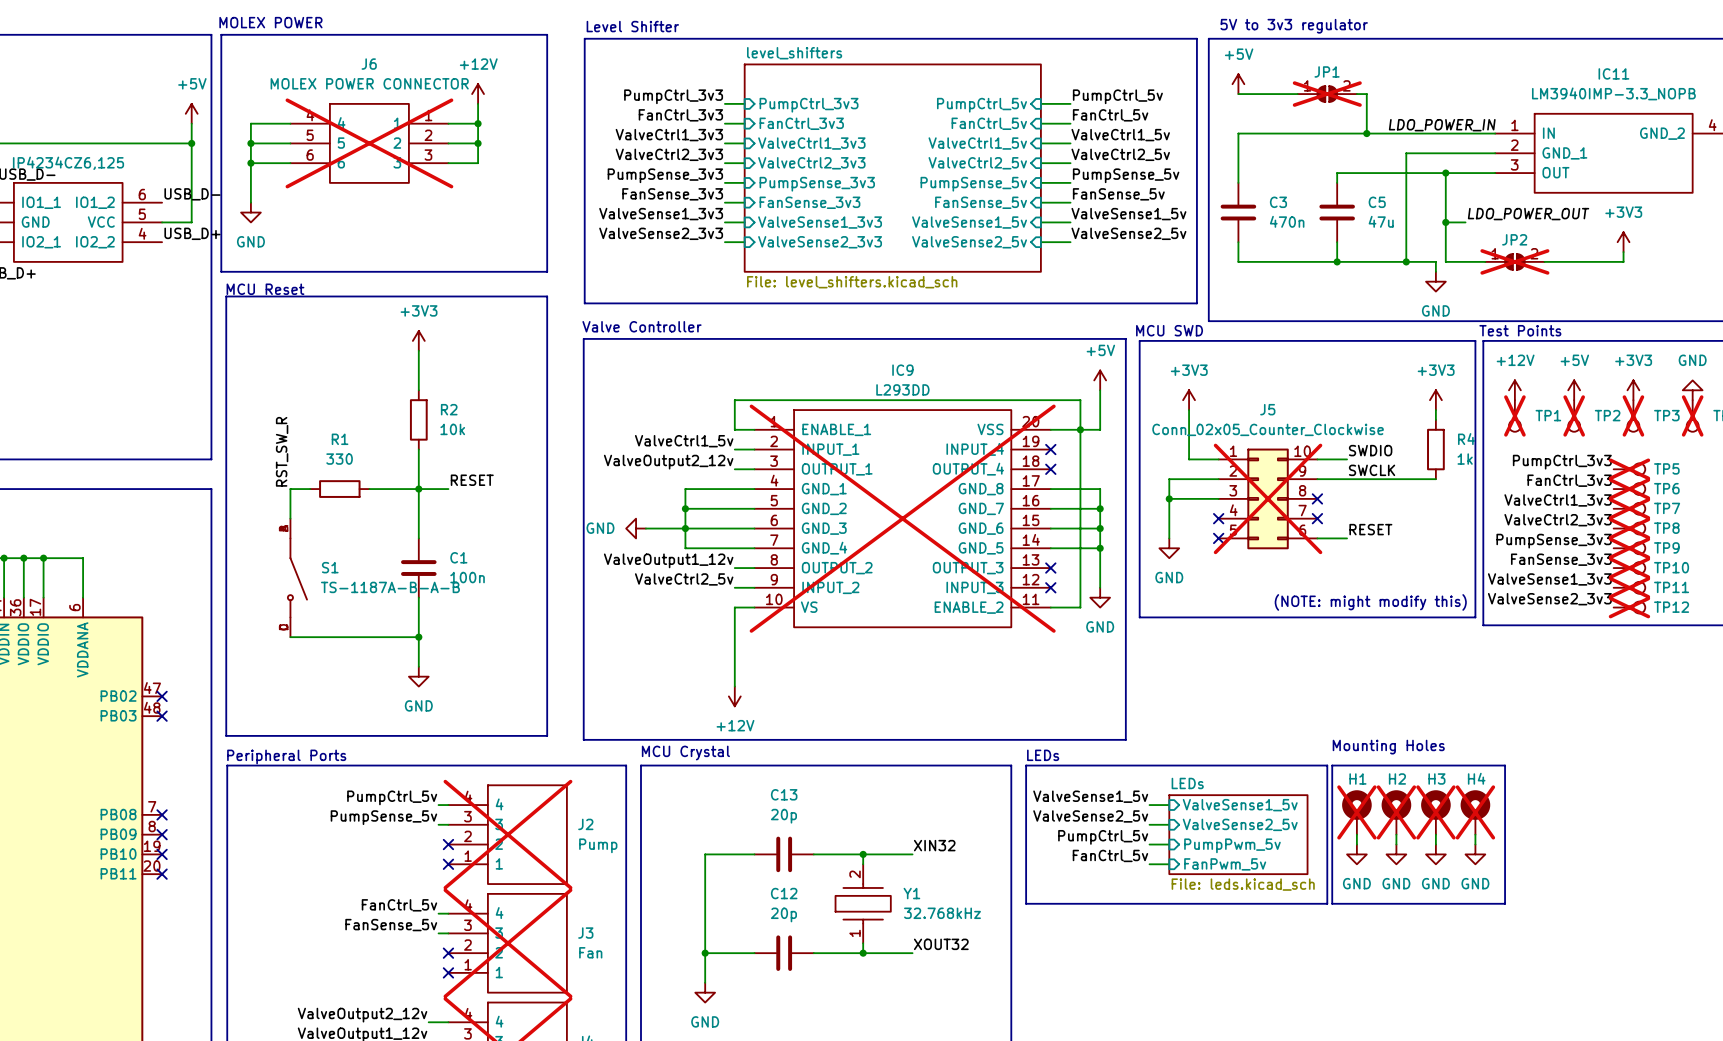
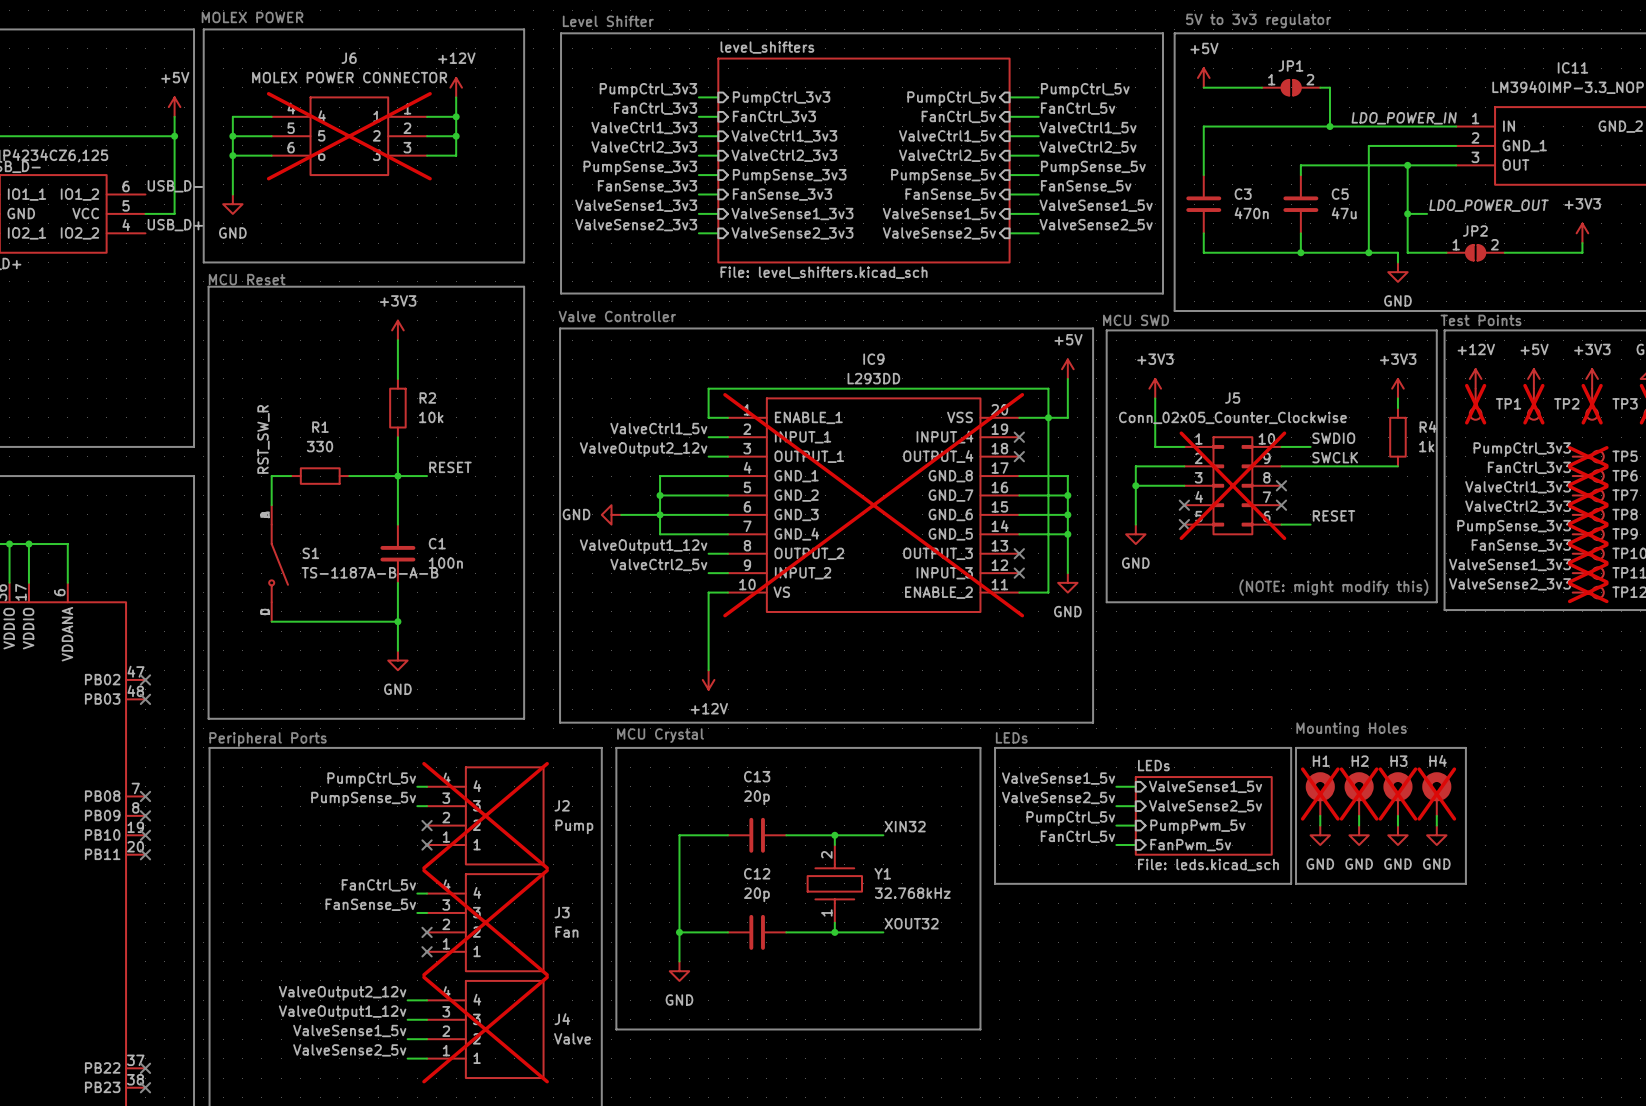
JP1 do-not-place cross: (1327, 94) -> none
JP2 do-not-place cross: (1514, 261) -> none

